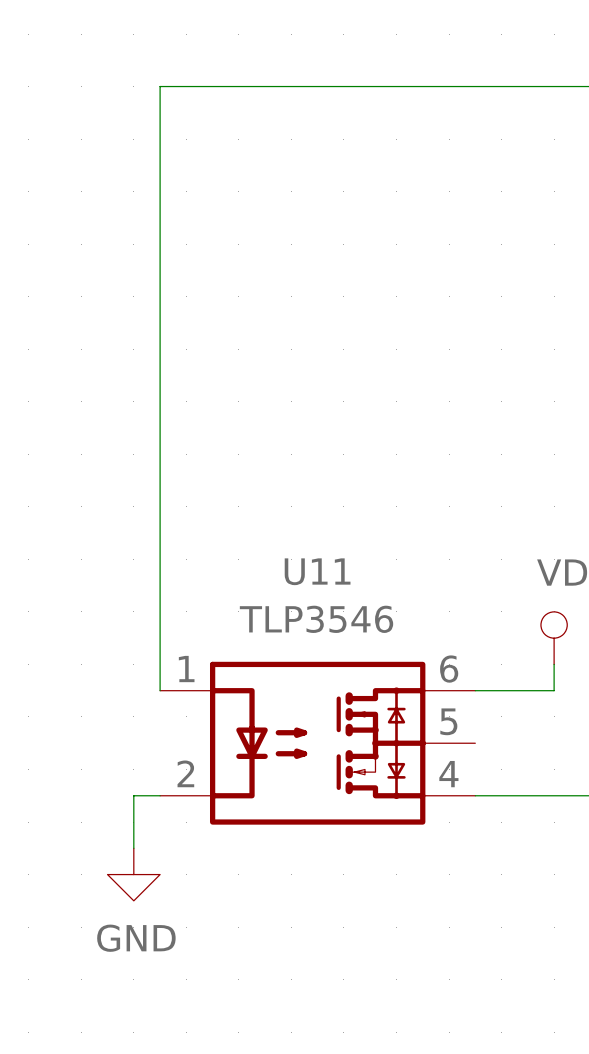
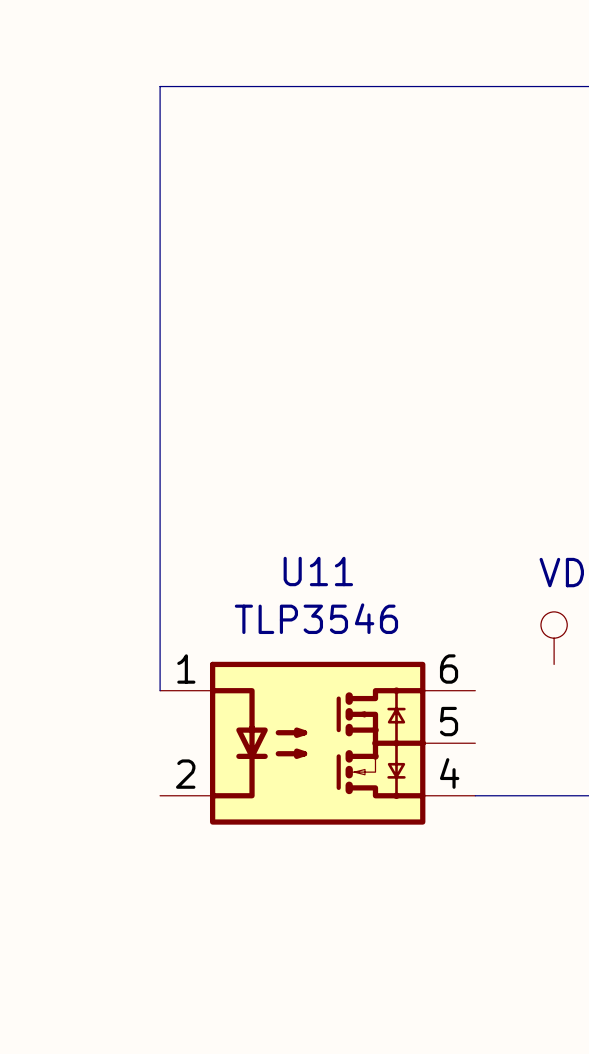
wire: (554, 664) (554, 690) (475, 690) -> none
wire: (160, 795) (133, 795) (133, 848) -> none
power symbol: GND (133, 874) -> none

